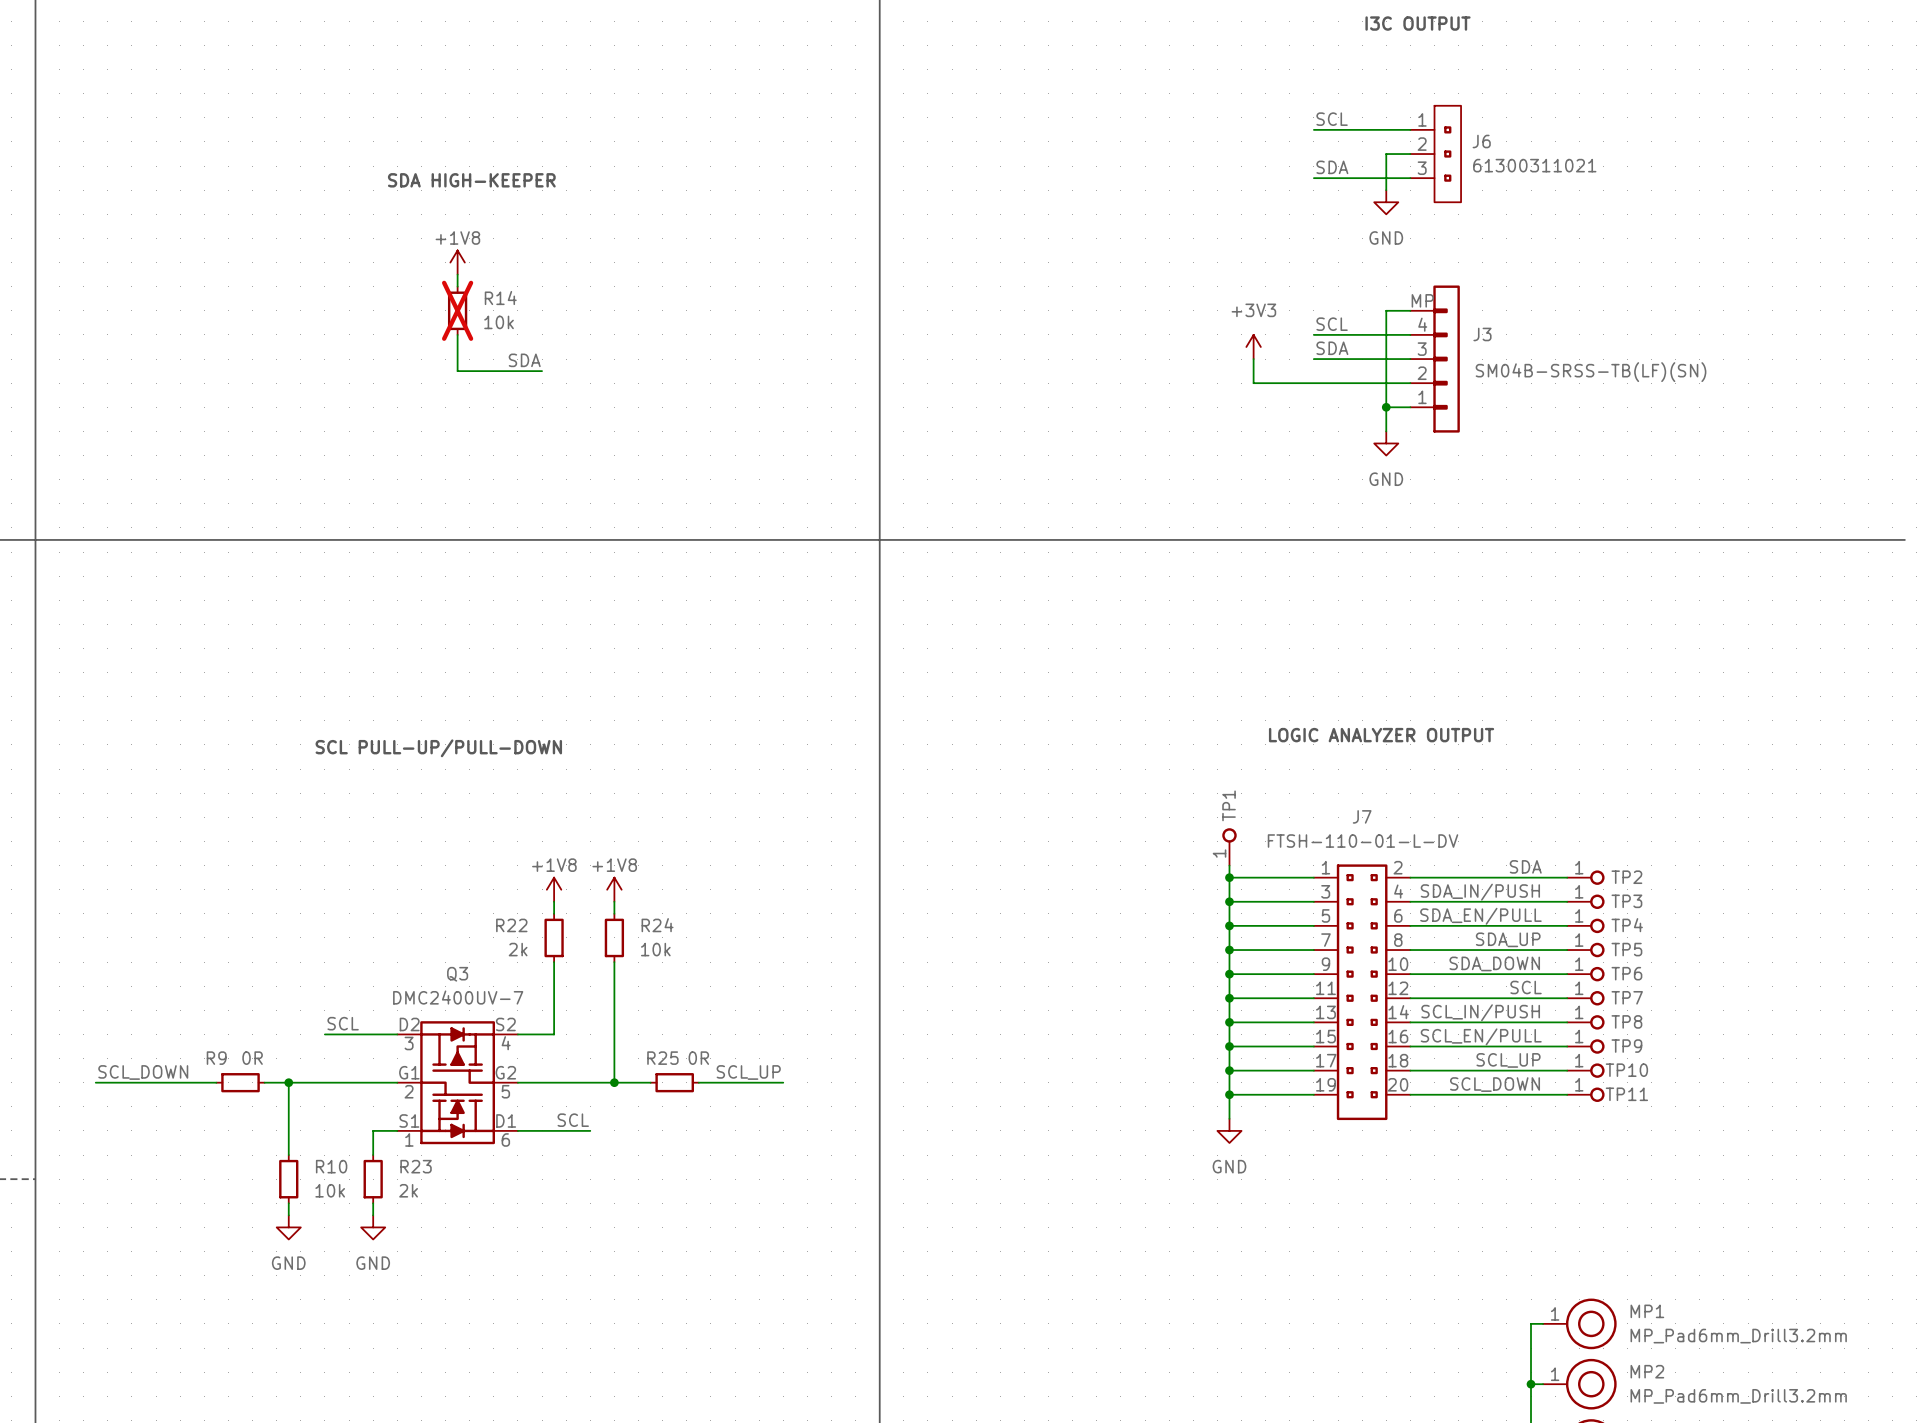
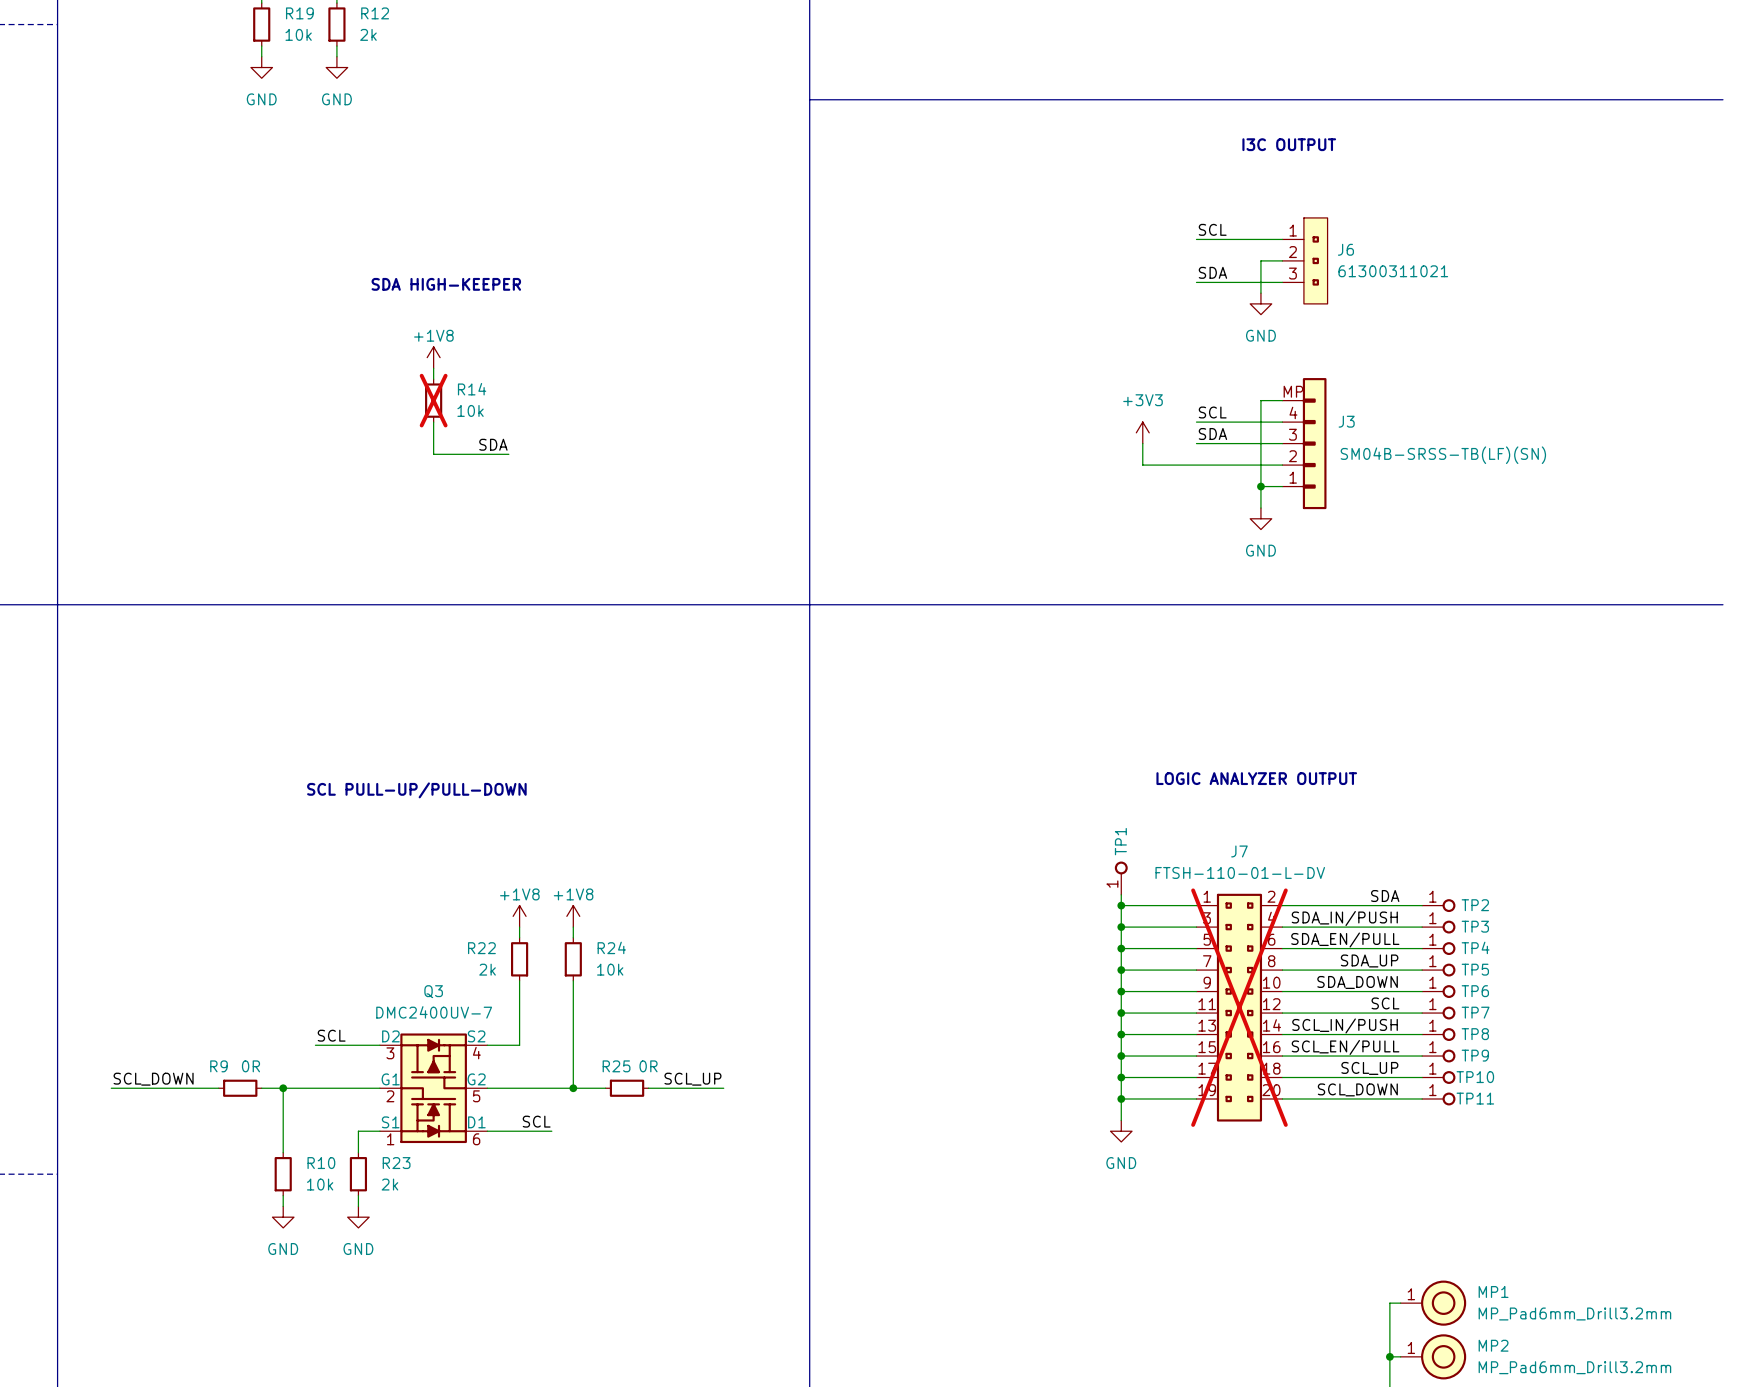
J7 do-not-place cross: none -> (1239, 1007)

